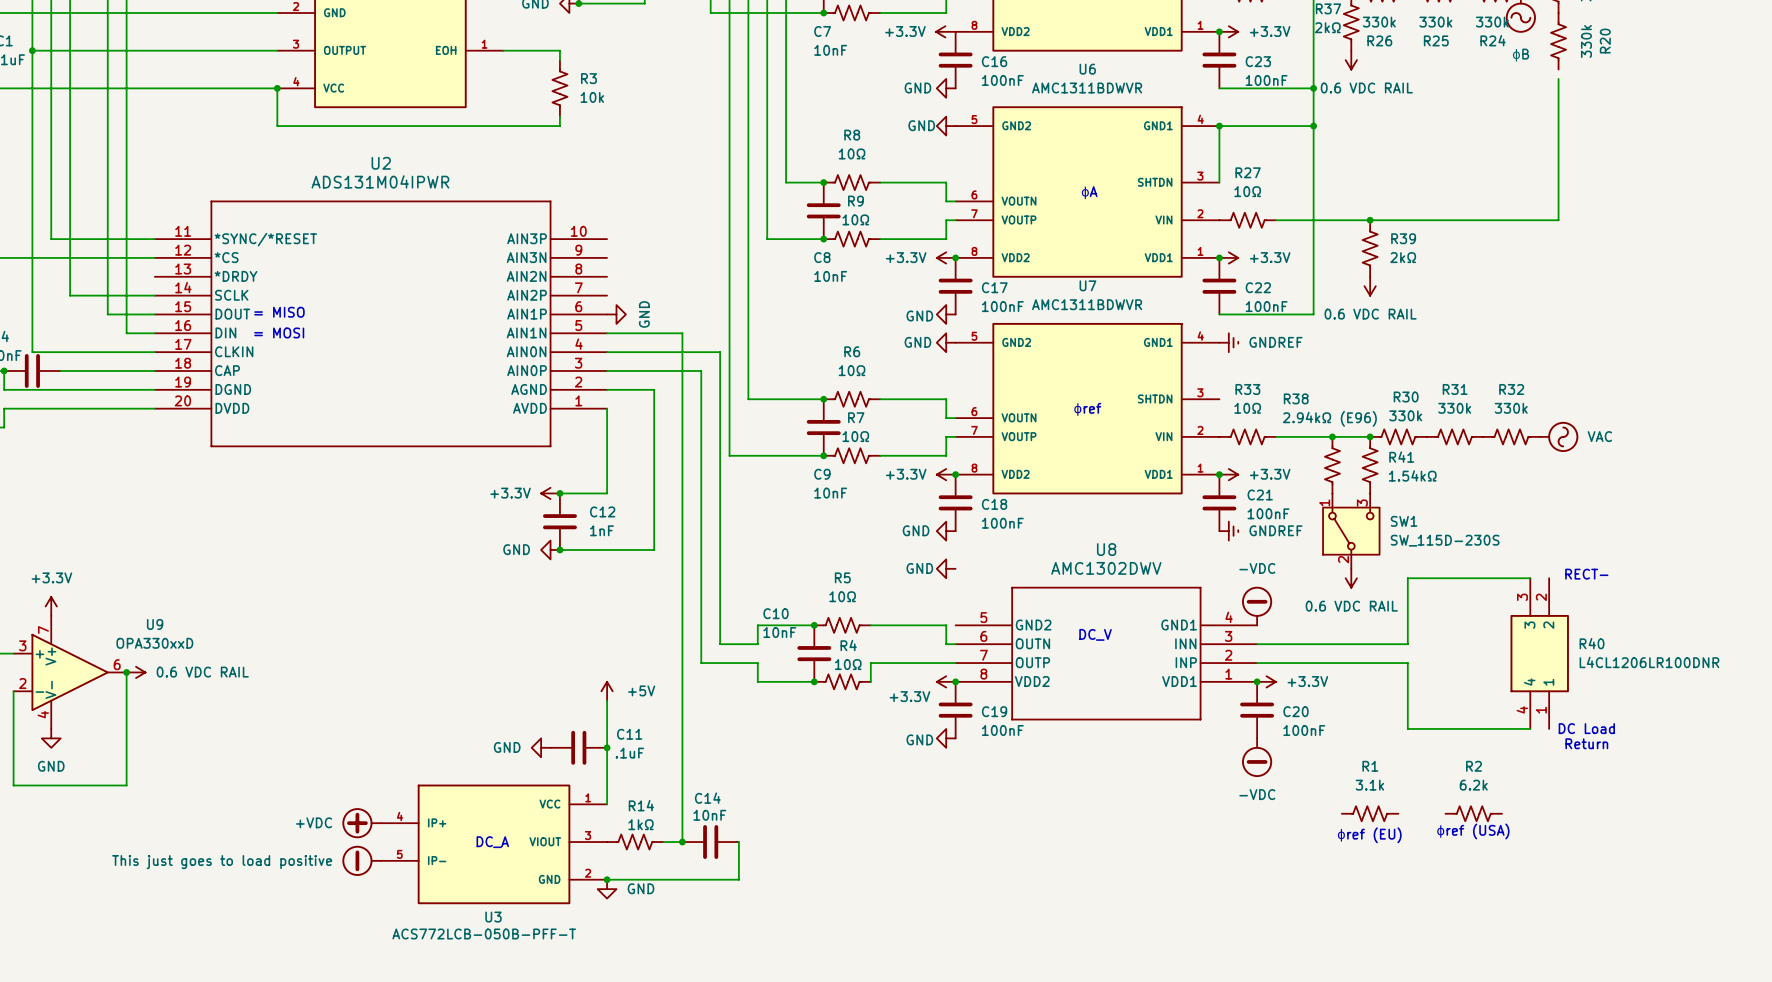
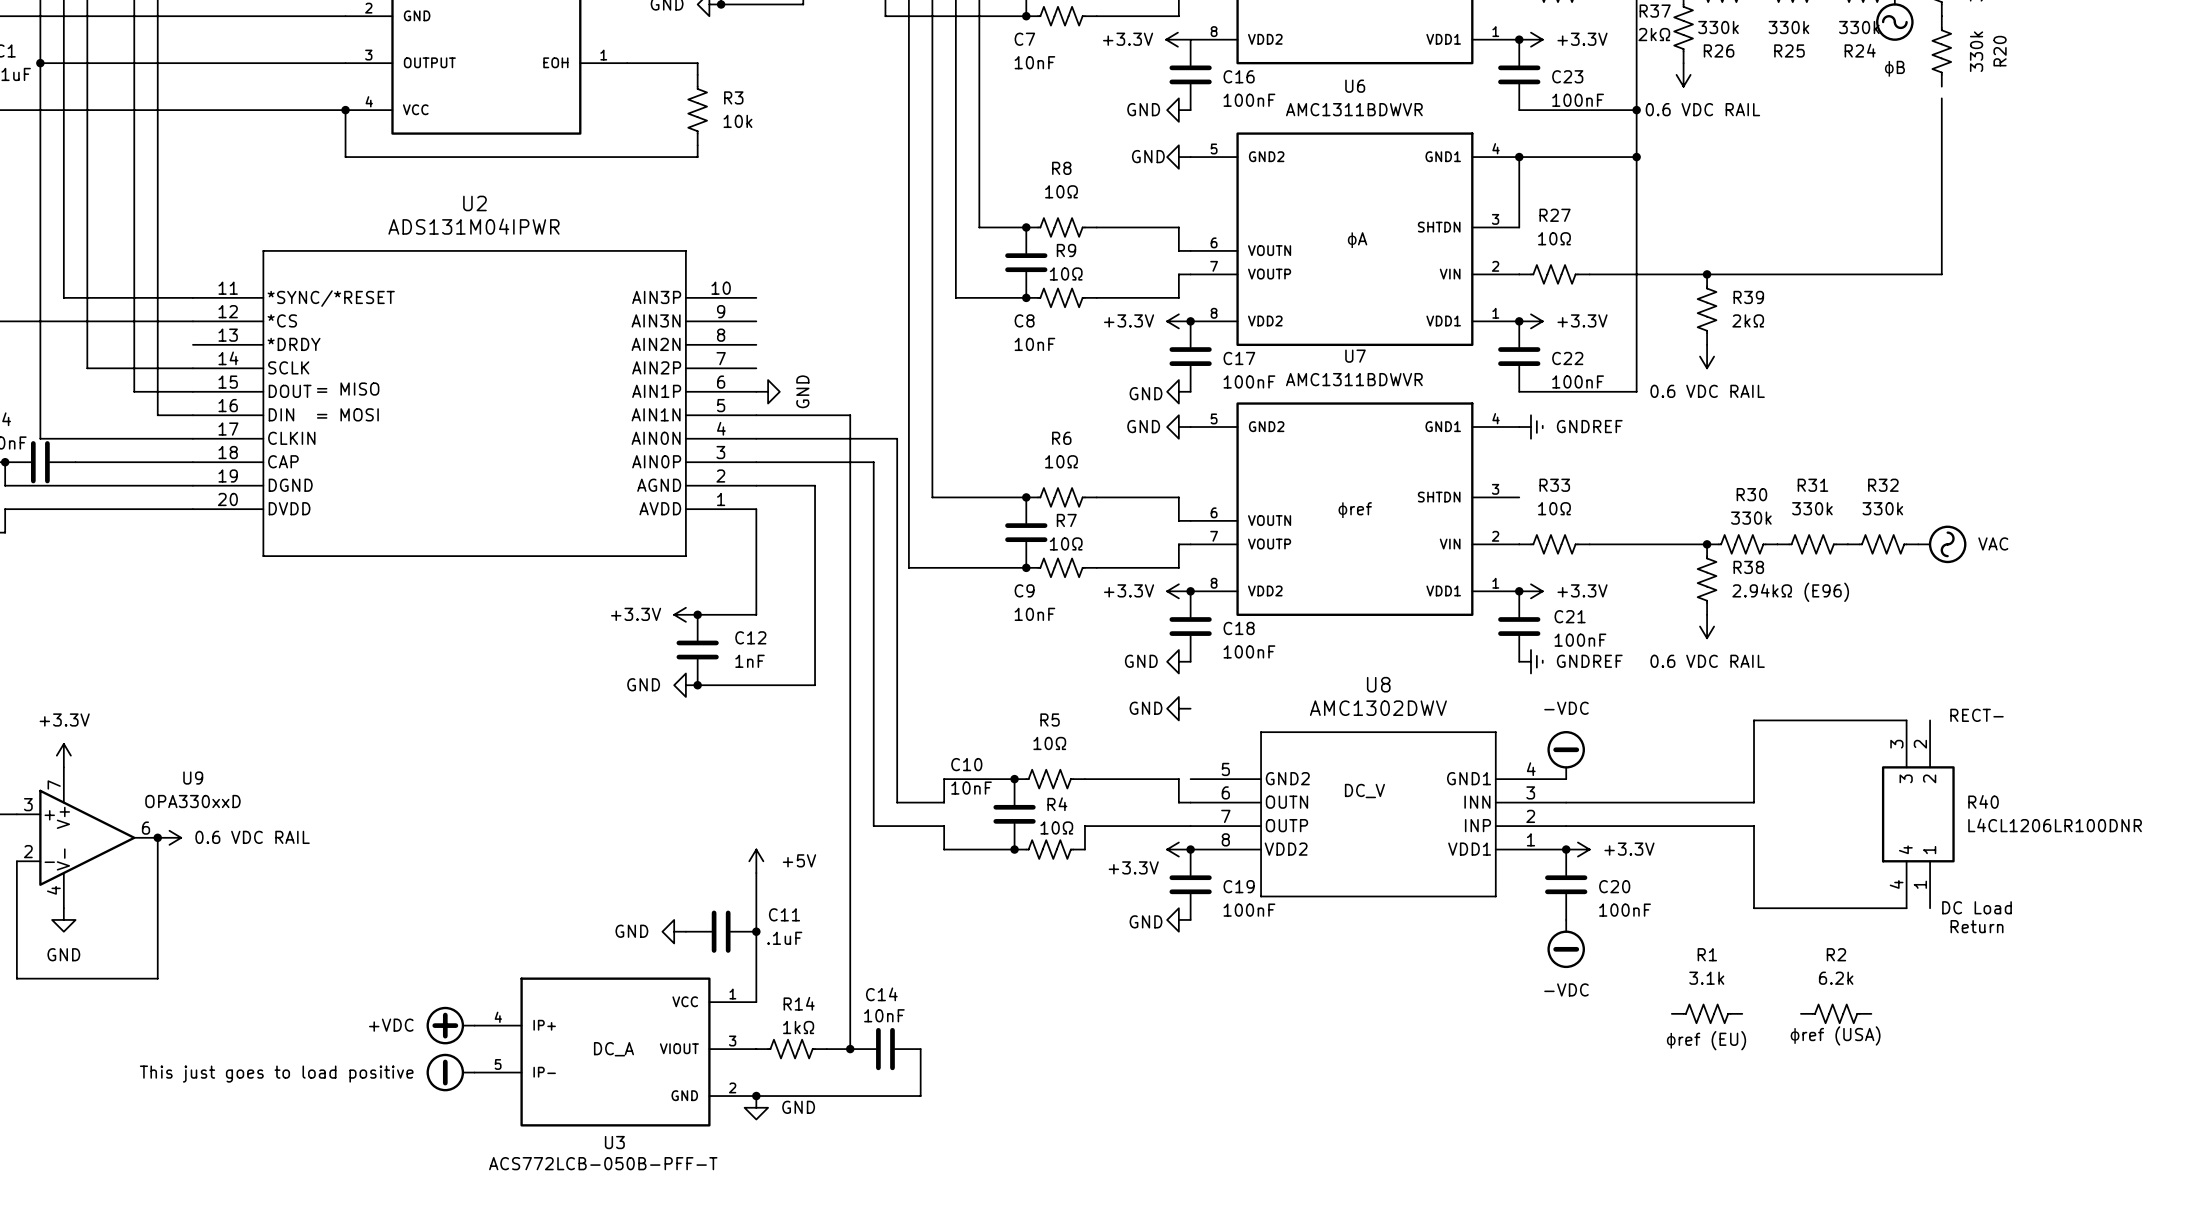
junction: (1332, 436) -> none
R41 name: R41 (1401, 457) -> R38 (1748, 567)
R38: 2.94kΩ (E96) (1332, 465) -> none
R41 value: 1.54kΩ (1412, 475) -> 2.94kΩ (E96) (1790, 592)
SW1: SW_115D-230S (1351, 531) -> none
power symbol position: 0.6 VDC RAIL (1351, 578) -> 0.6 VDC RAIL (1707, 626)

